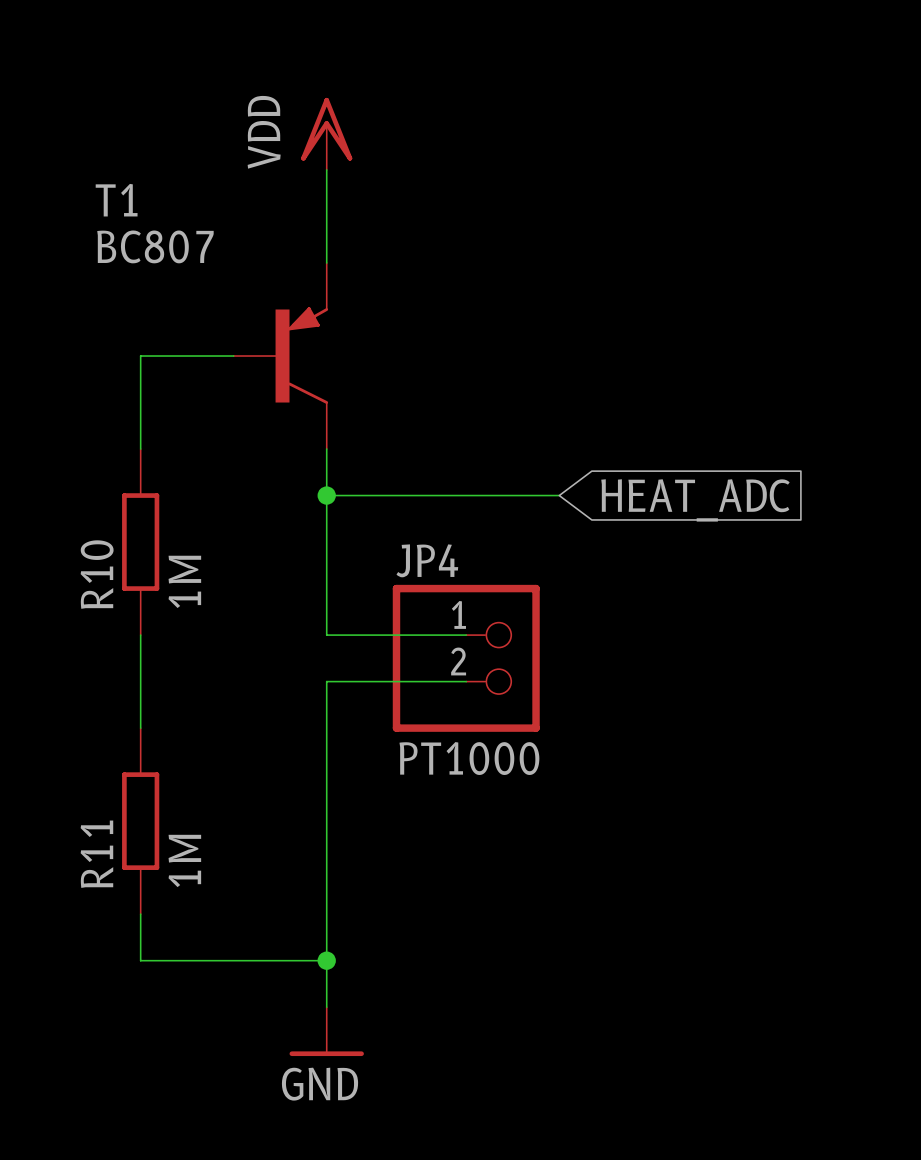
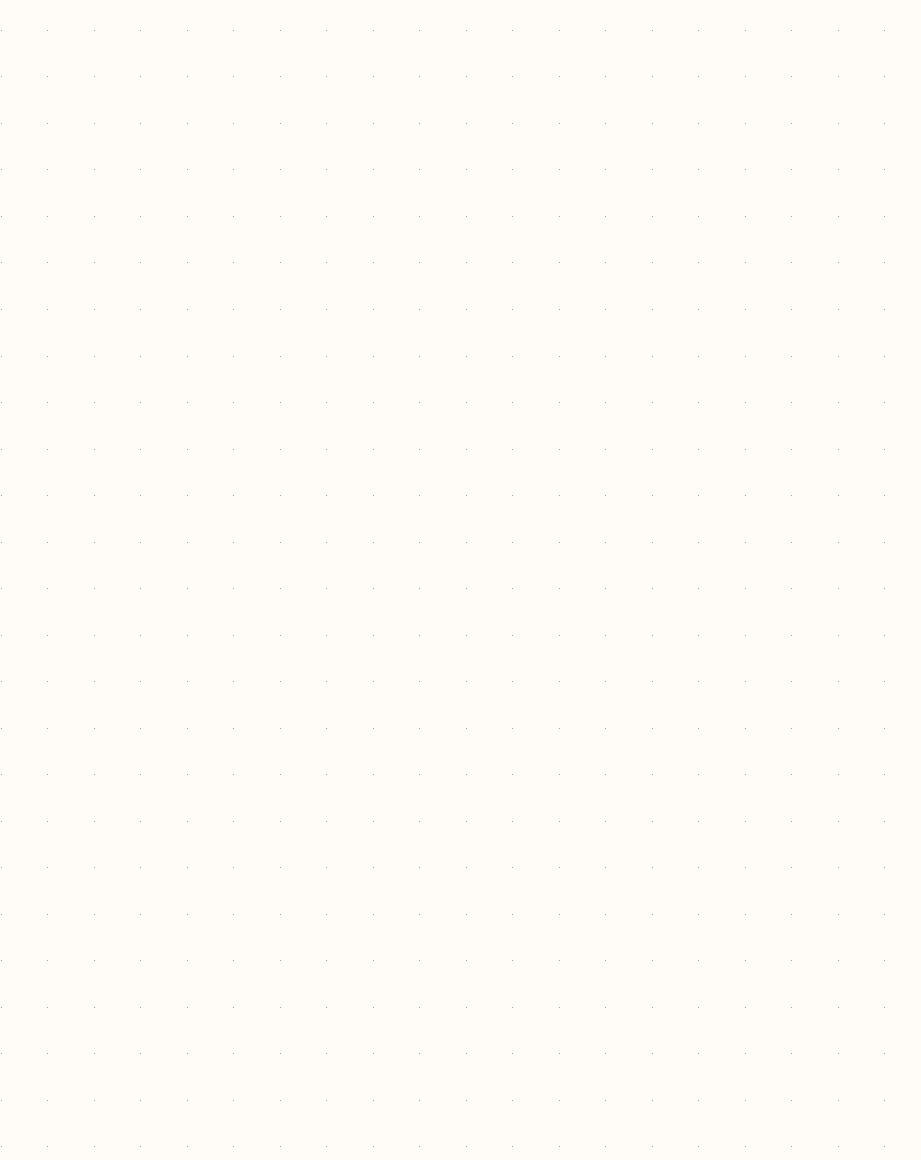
power symbol: VDD (326, 133) -> none
wire: (326, 169) (326, 262) -> none
wire: (233, 356) (140, 356) (140, 449) -> none
T1: BC807 (280, 356) -> none
wire: (326, 449) (326, 635) (466, 635) -> none
wire: (326, 495) (559, 495) -> none
junction: (326, 495) -> none
global label: HEAT_ADC (695, 500) -> none
R10: 1M (140, 542) -> none
wire: (140, 635) (140, 728) -> none
JP4: PT1000 (466, 658) -> none
wire: (466, 681) (326, 681) (326, 1007) -> none
R11: 1M (140, 821) -> none
wire: (140, 914) (140, 960) (326, 960) -> none
junction: (326, 960) -> none
power symbol: GND (326, 1031) -> none

